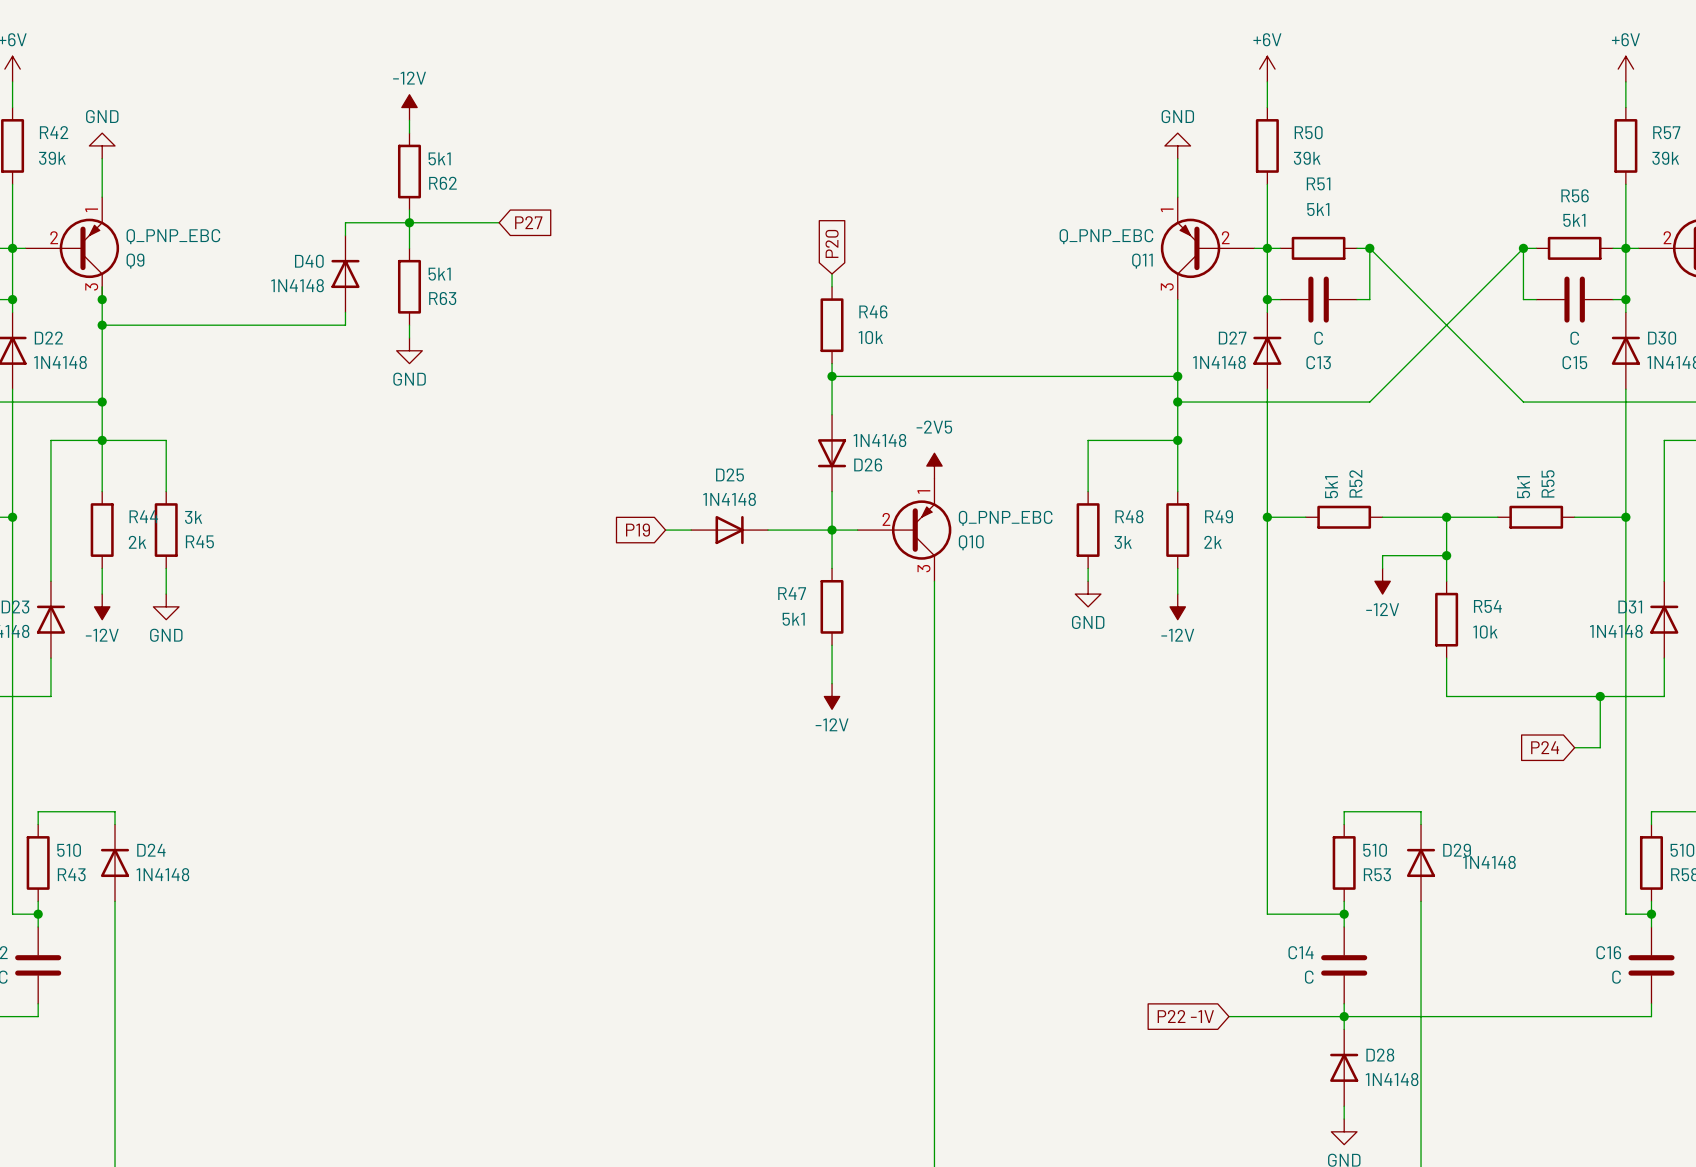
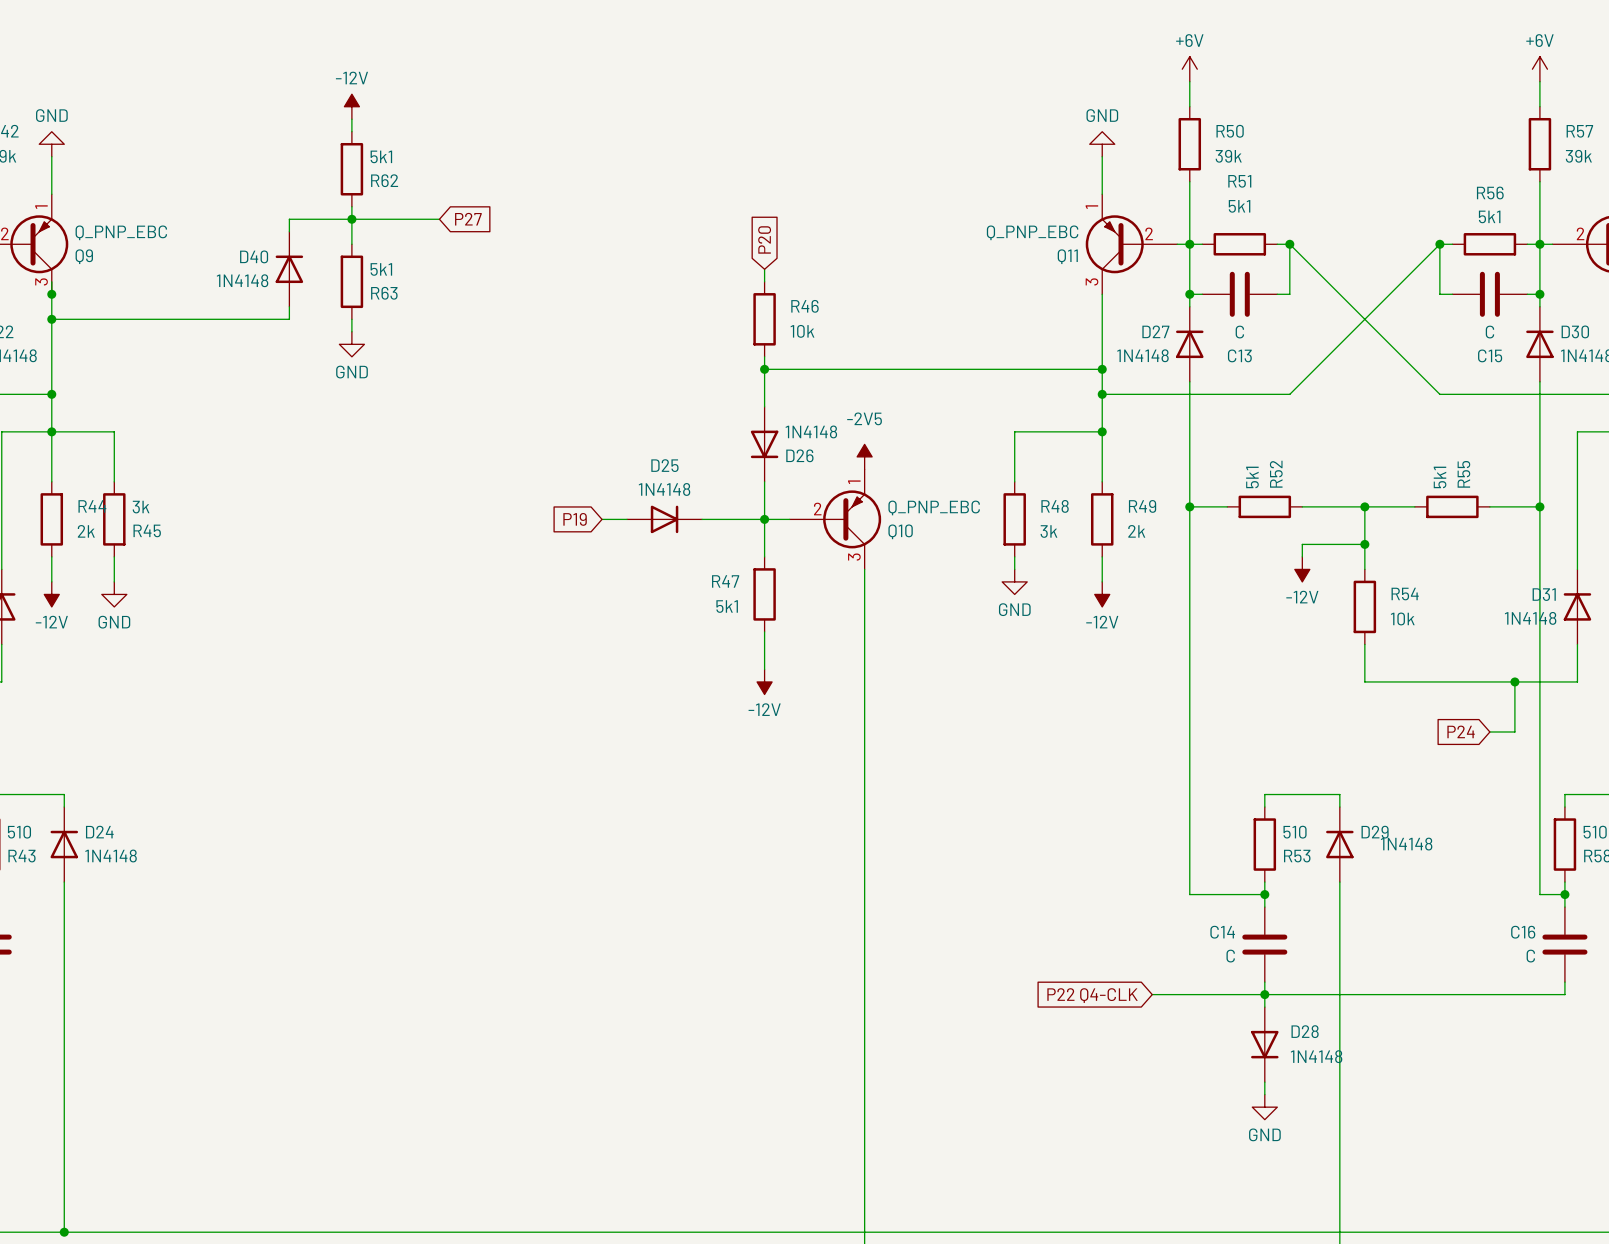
global label: P22 -1V (1185, 1016) -> P22 Q4-CLK (1092, 995)
D28 rotation: 0° (1344, 1067) -> 180° (1264, 1044)

